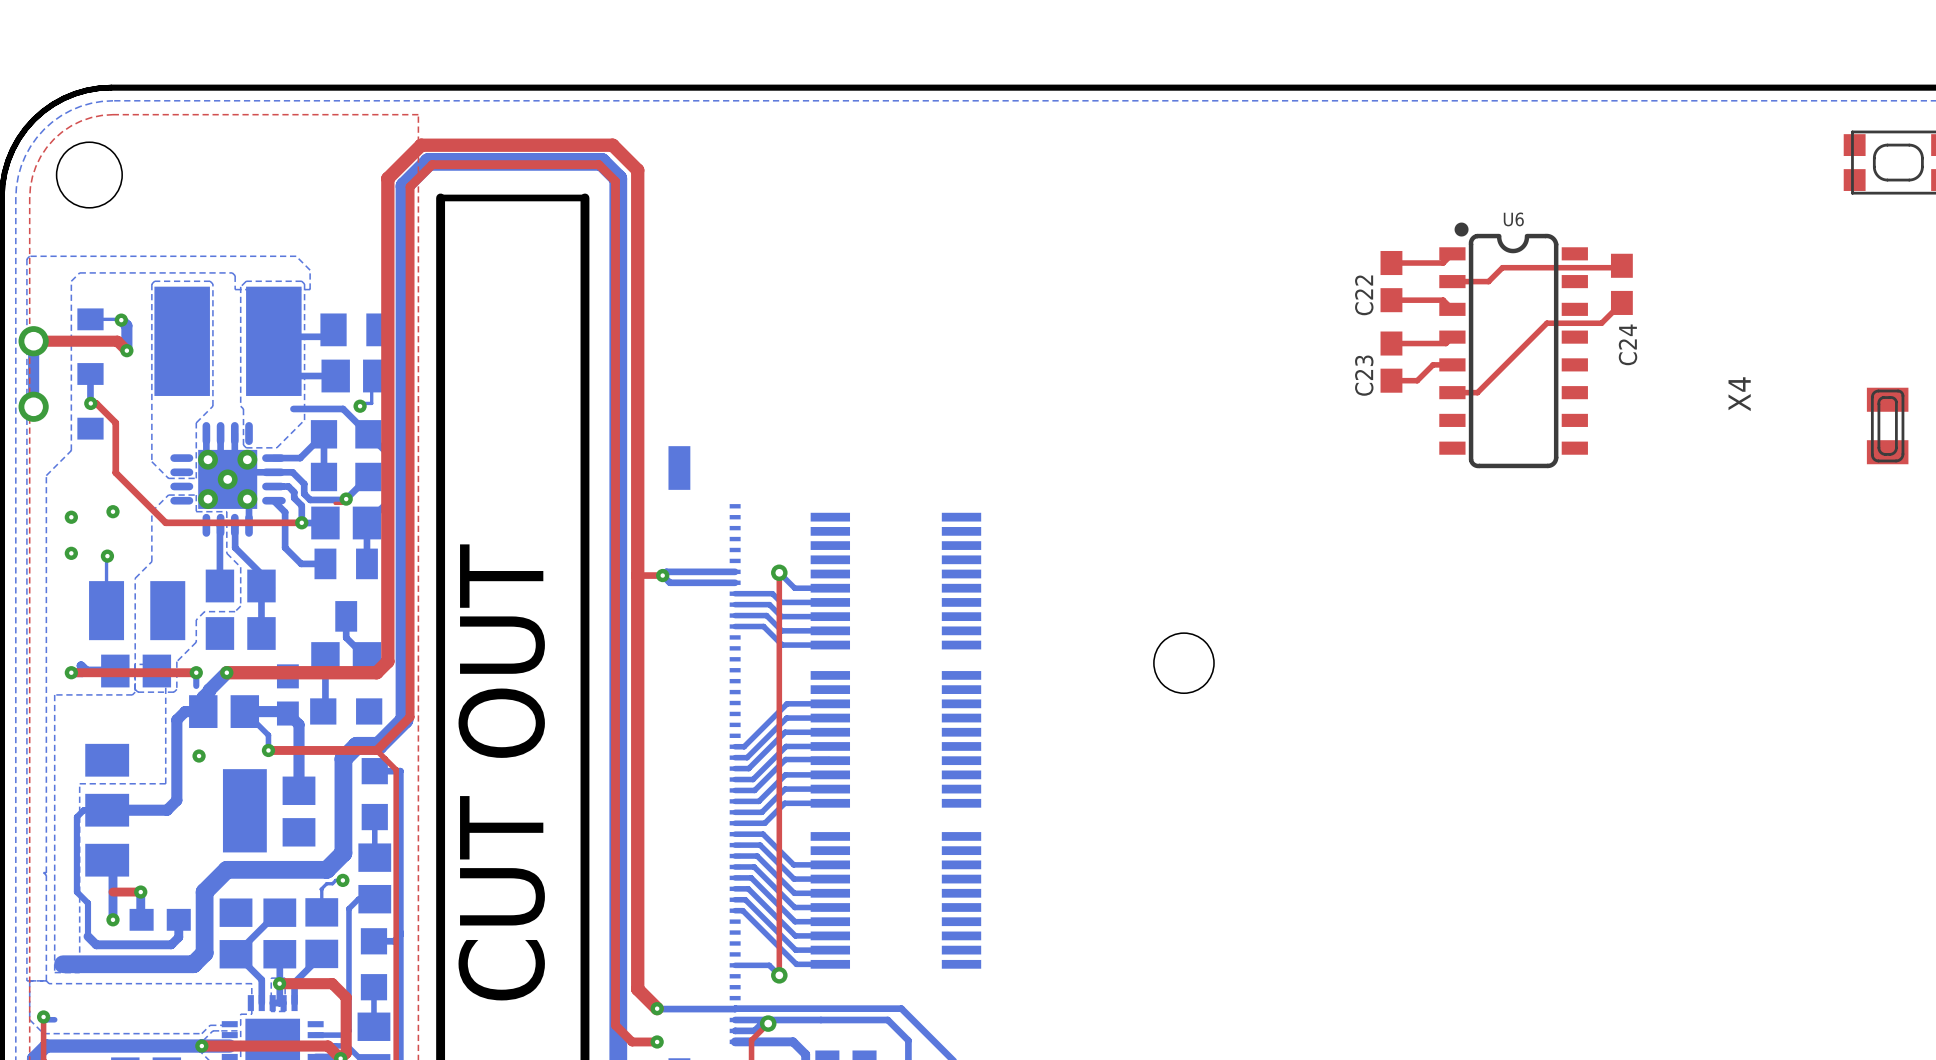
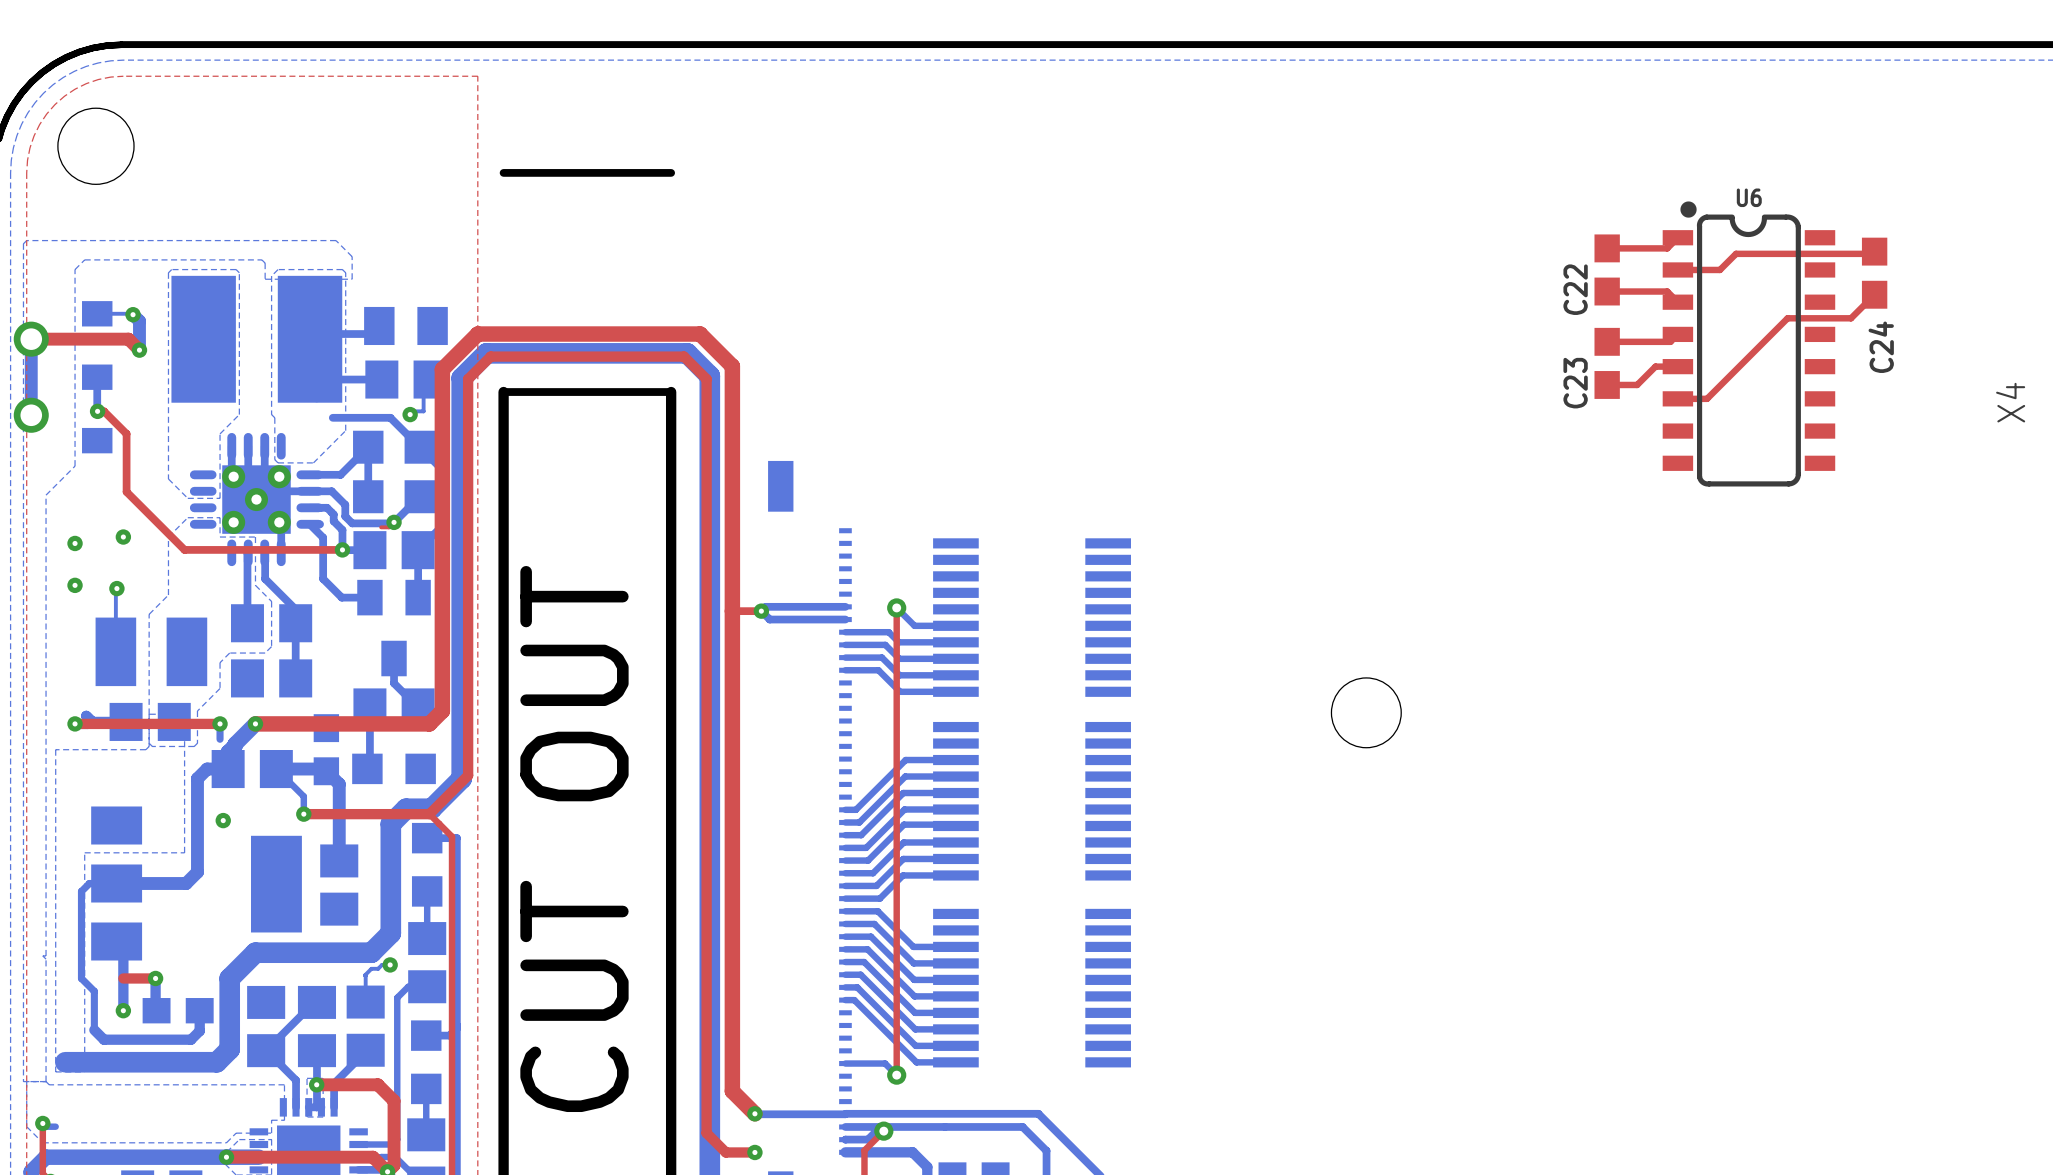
board edge: (440, 197) (440, 386) (440, 197) -> none
board edge: (584, 197) (584, 386) (584, 197) -> none
top track: (637, 364) (637, 170) (612, 145) (421, 145) (387, 178) (387, 367) -> (732, 366) (700, 334) (477, 334) (442, 369)
bottom track: (618, 372) (618, 178) (601, 161) (428, 161) (404, 186) (404, 374) -> (709, 375) (687, 353) (486, 353) (461, 378)
top track: (410, 375) (410, 186) (432, 164) (598, 164) (615, 181) (615, 375) -> (468, 379) (490, 356) (684, 356) (706, 379)
board edge: none -> (503, 392) (671, 392) (503, 392)

